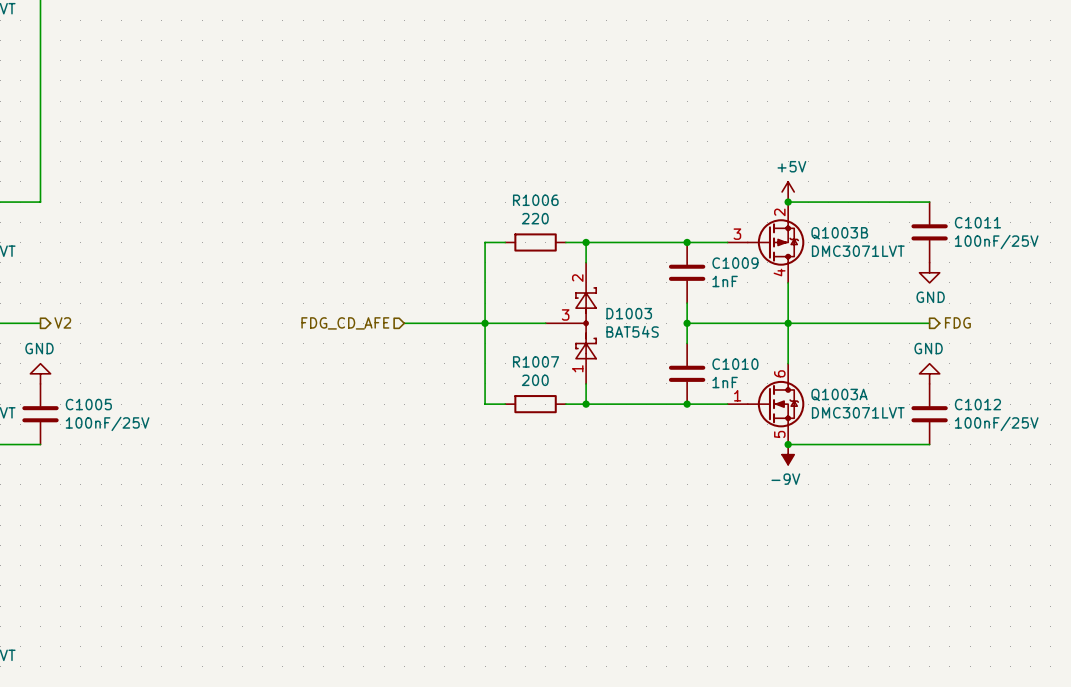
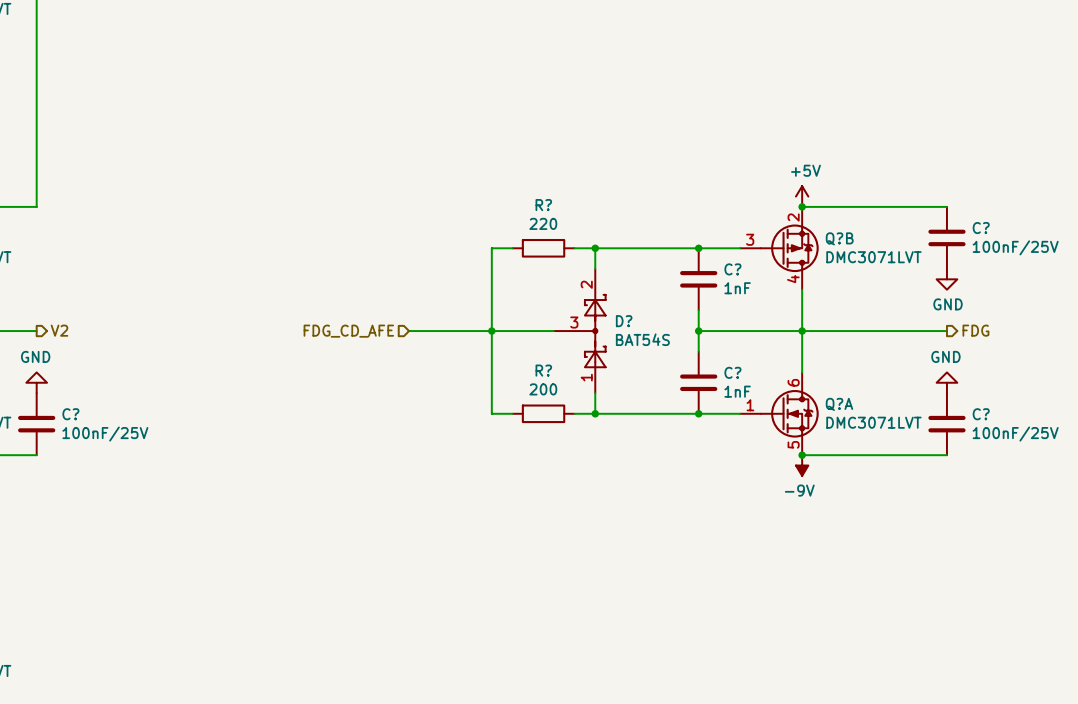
R1006 name: R1006 (535, 200) -> R? (543, 205)
C1011 name: C1011 (977, 222) -> C? (981, 228)
Q1003B name: Q1003B (839, 233) -> Q?B (839, 238)
C1009 name: C1009 (735, 263) -> C? (732, 269)
D1003 name: D1003 (629, 313) -> D? (624, 321)
R1007 name: R1007 (536, 361) -> R? (543, 370)
C1010 name: C1010 (735, 364) -> C? (732, 372)
Q1003A name: Q1003A (839, 394) -> Q?A (839, 404)
C1005 name: C1005 (88, 404) -> C? (70, 414)
C1012 name: C1012 (977, 404) -> C? (981, 414)

